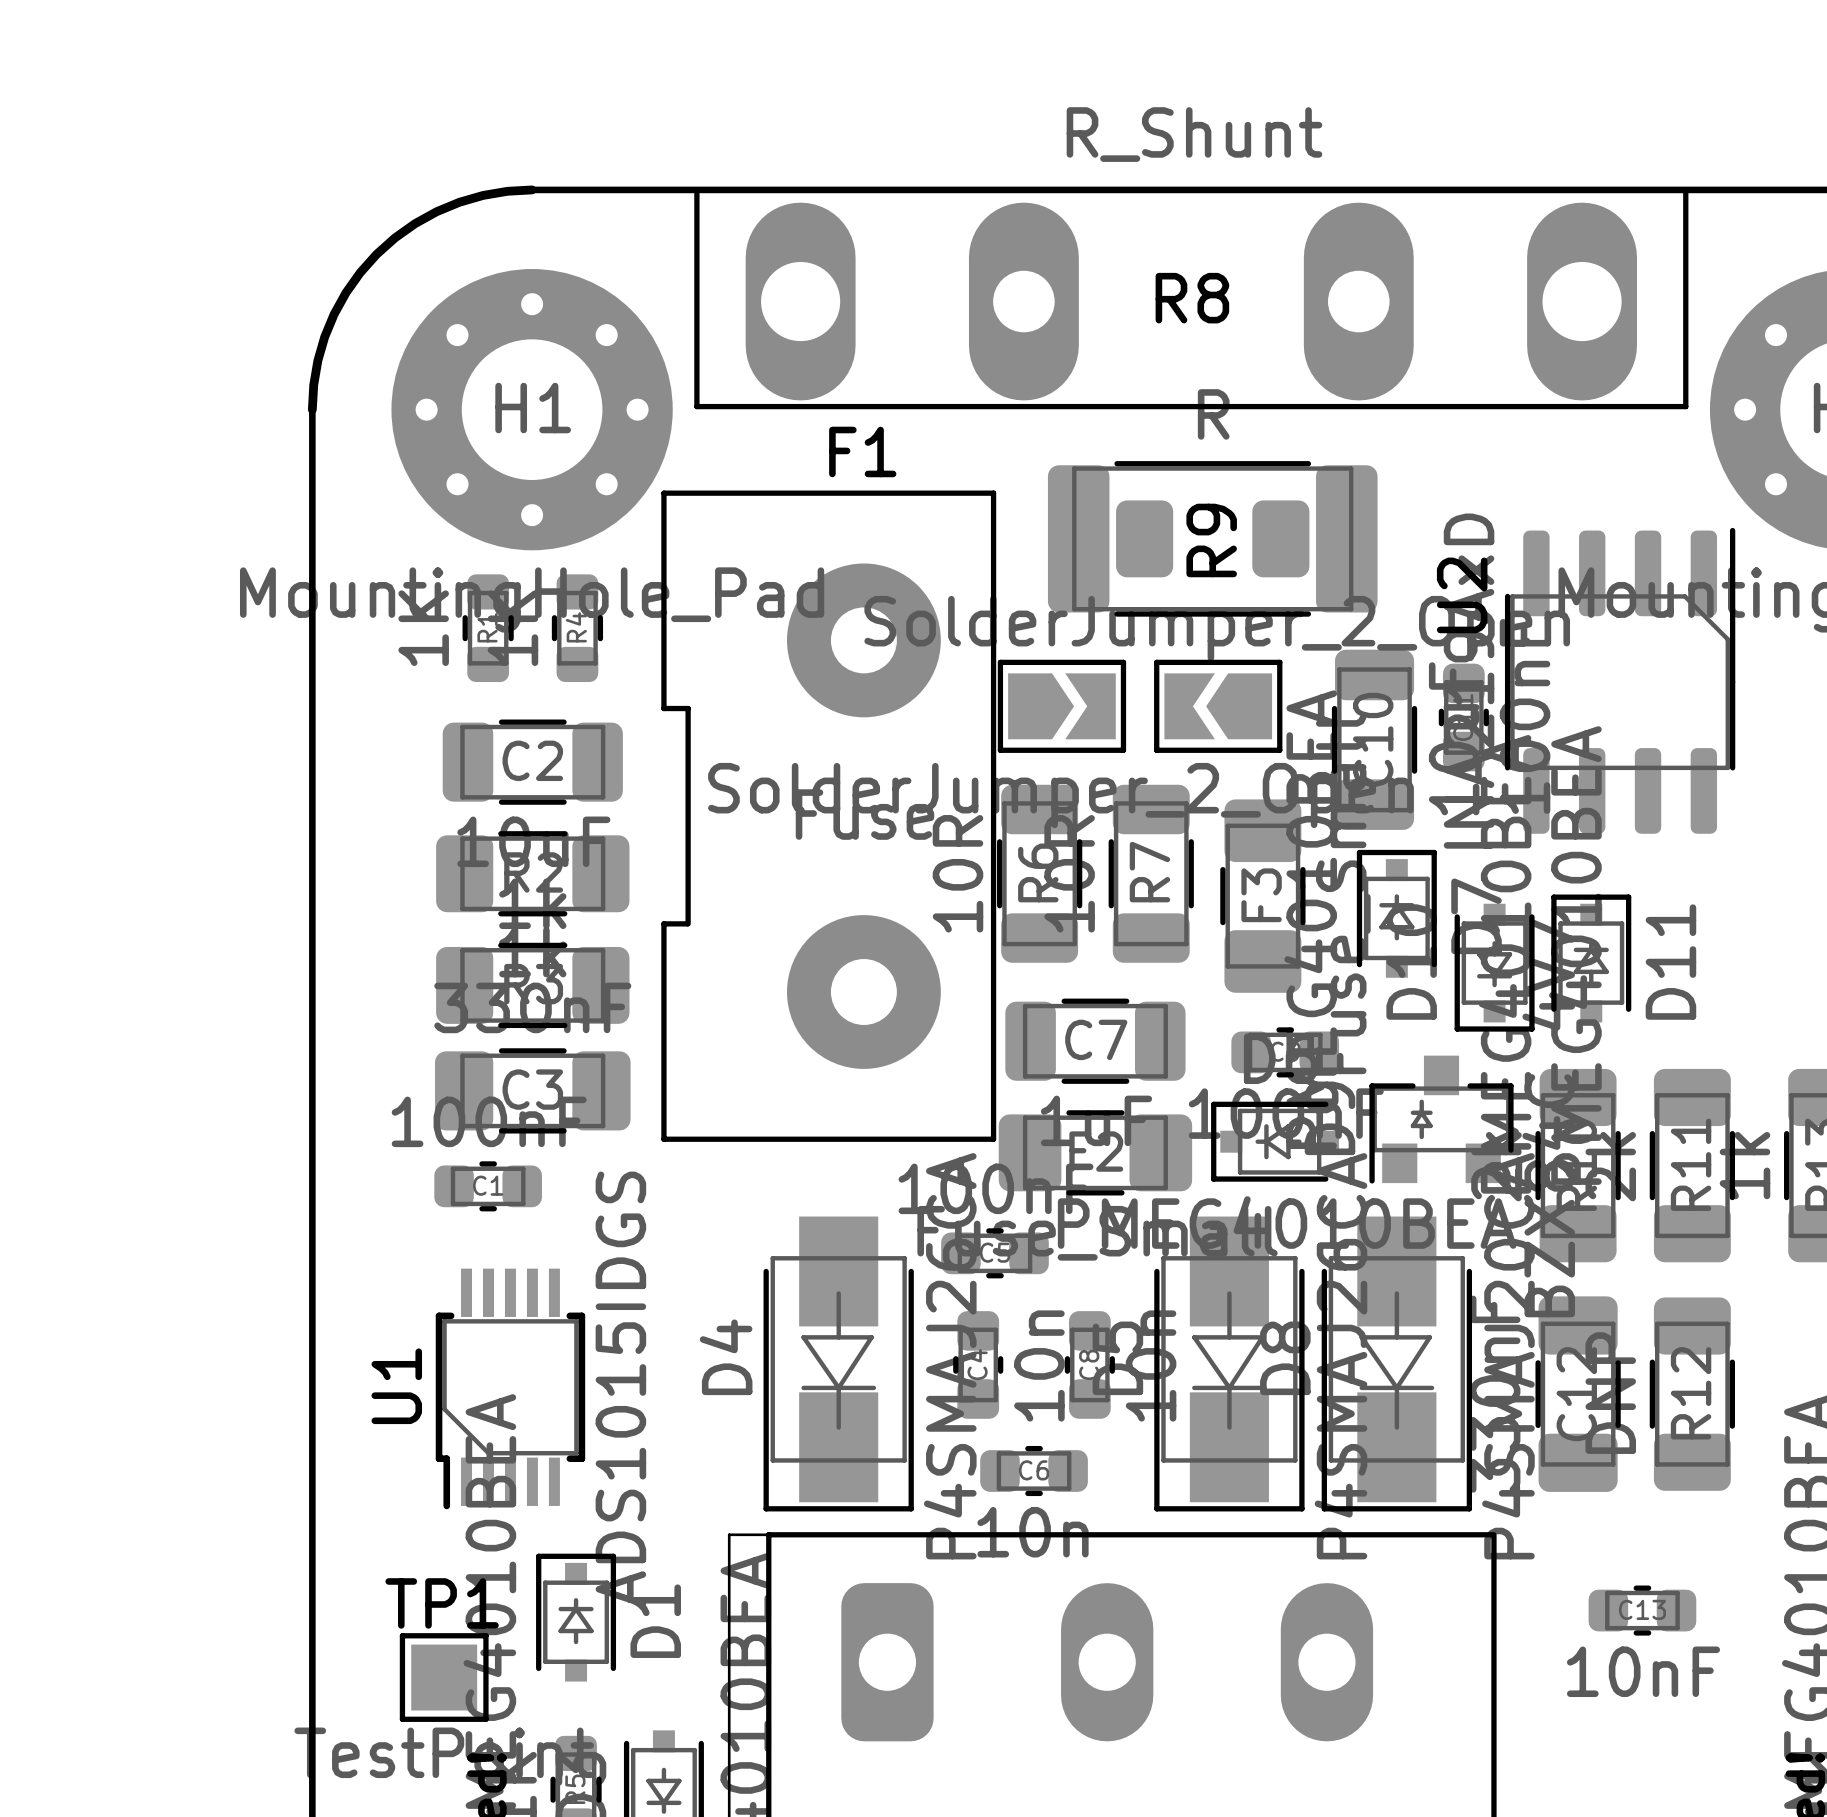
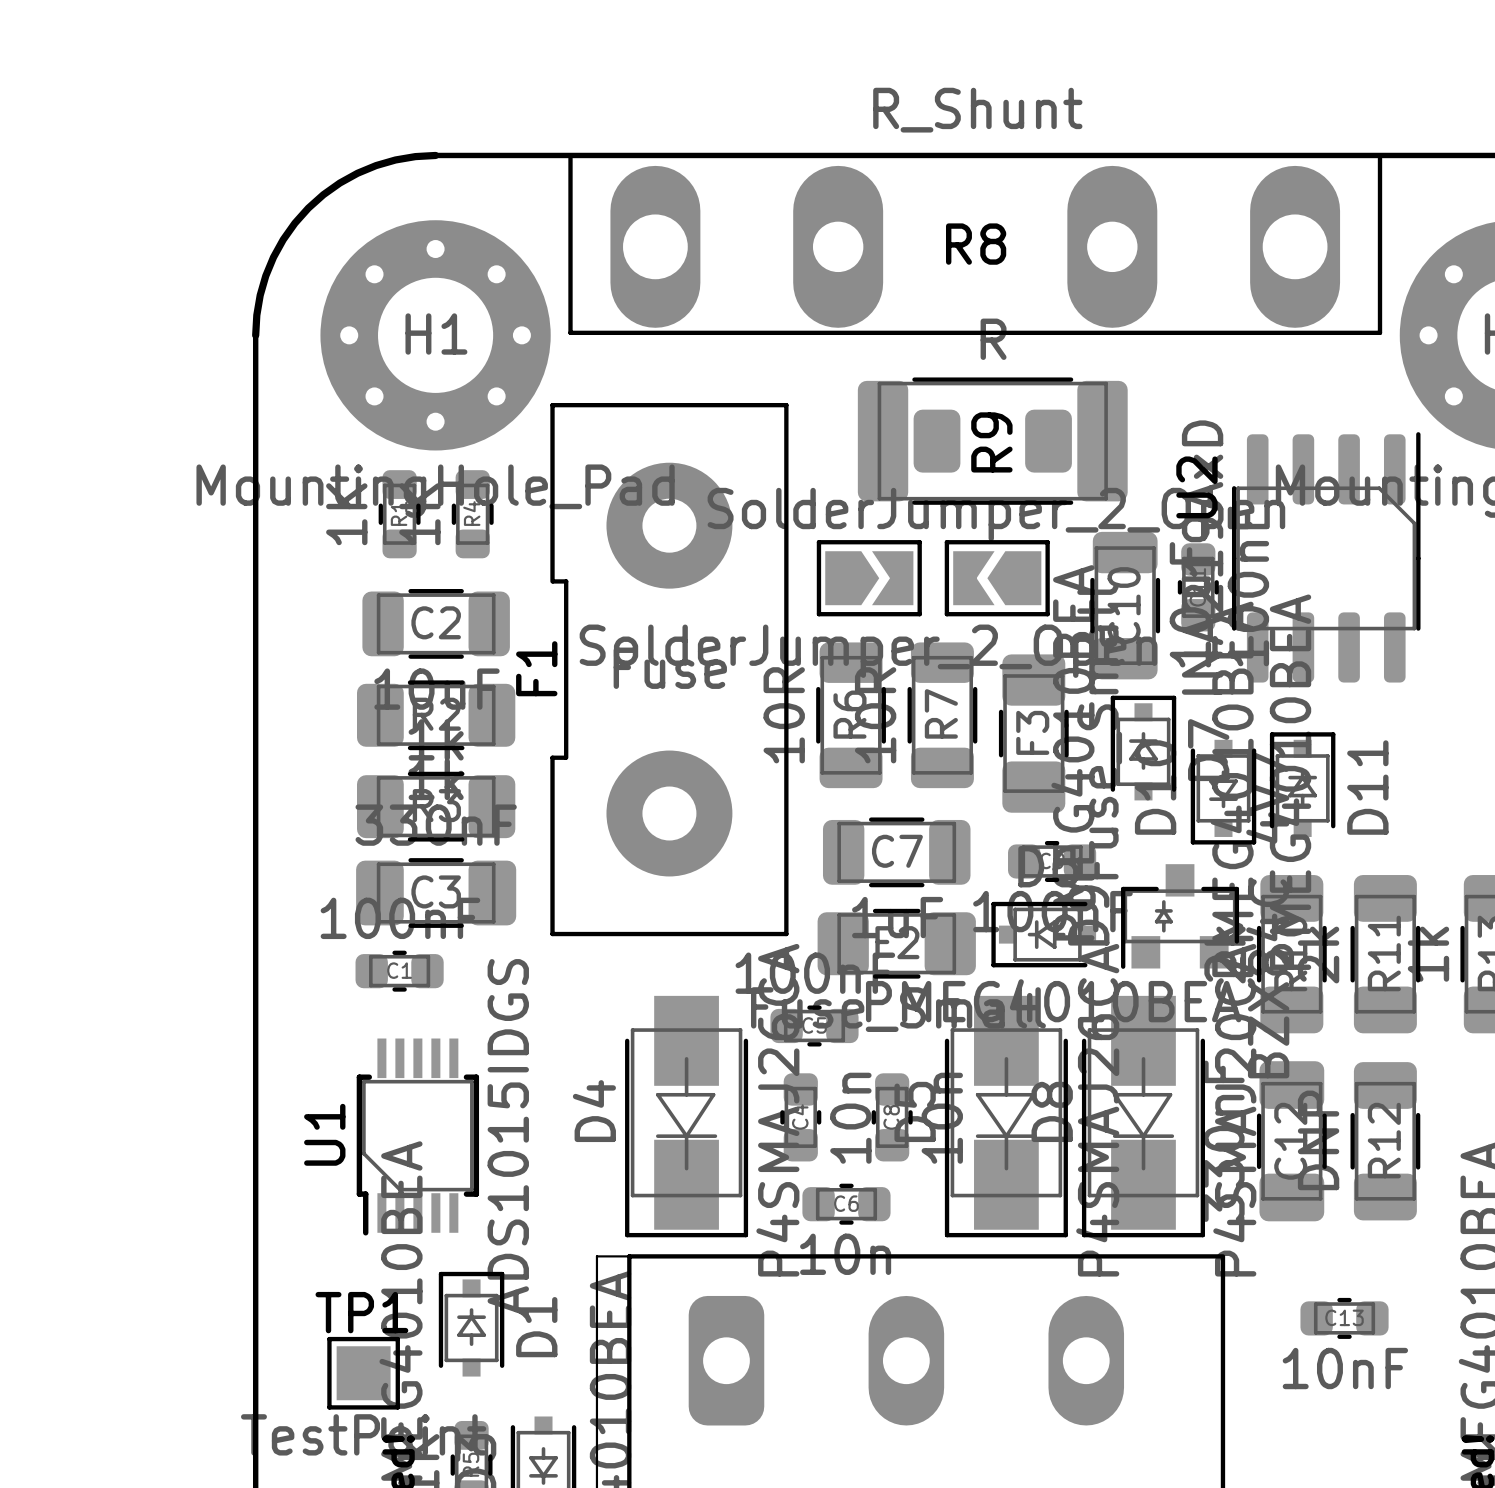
F1 name position: F1 (862, 451) -> F1 (536, 668)
F1 footprint: [661, 490, 997, 1142] -> [550, 402, 789, 937]

